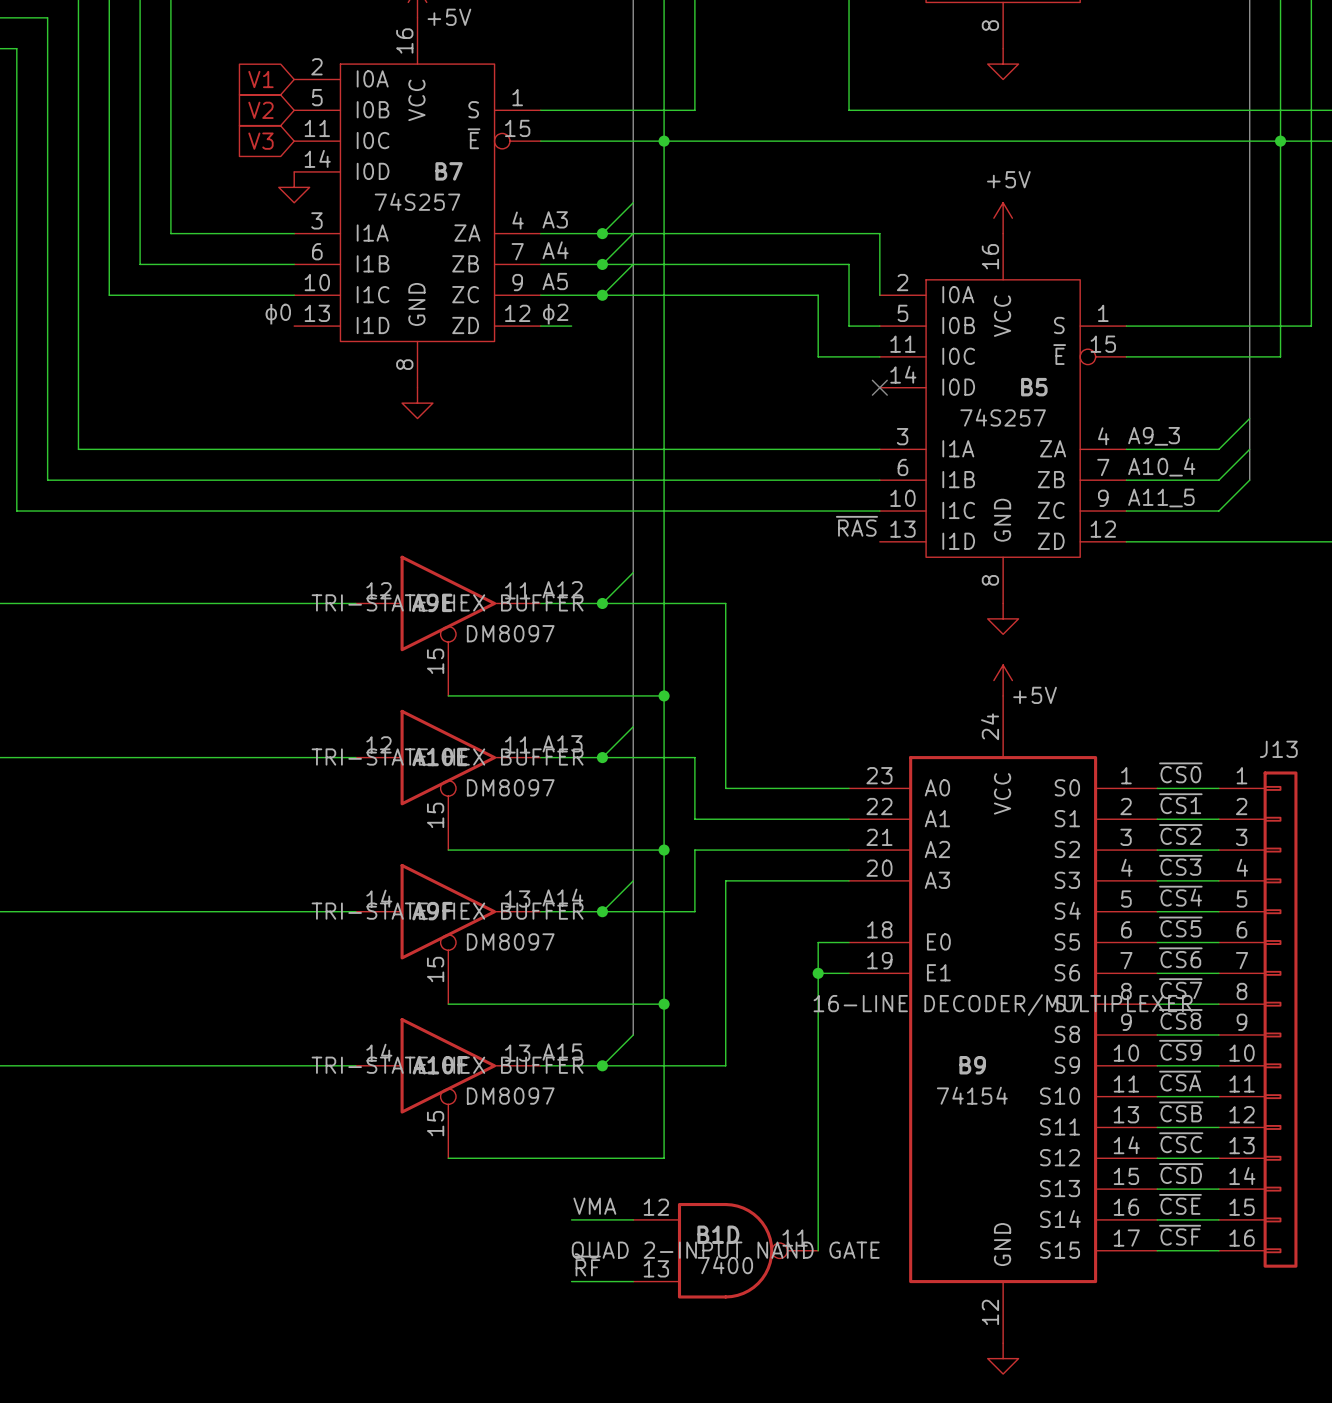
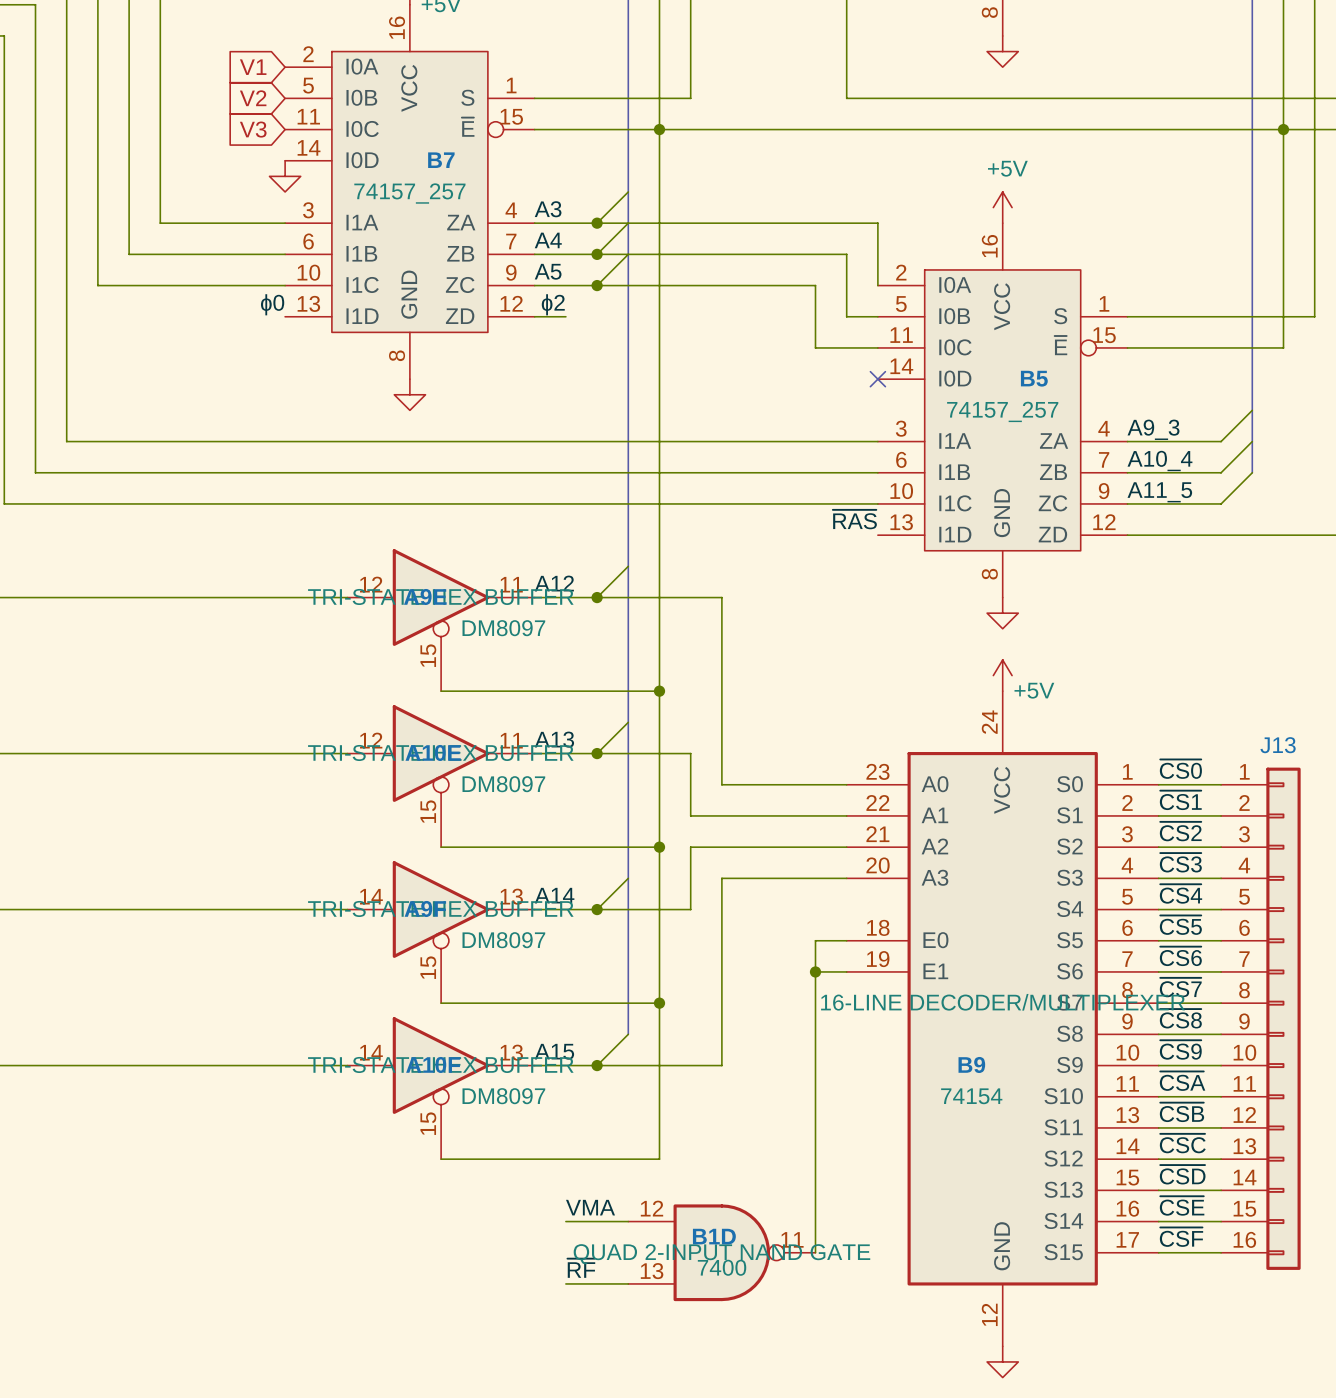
B7 value: 74S257 (417, 201) -> 74157_257 (409, 193)
B5 value: 74S257 (1003, 417) -> 74157_257 (1002, 411)

